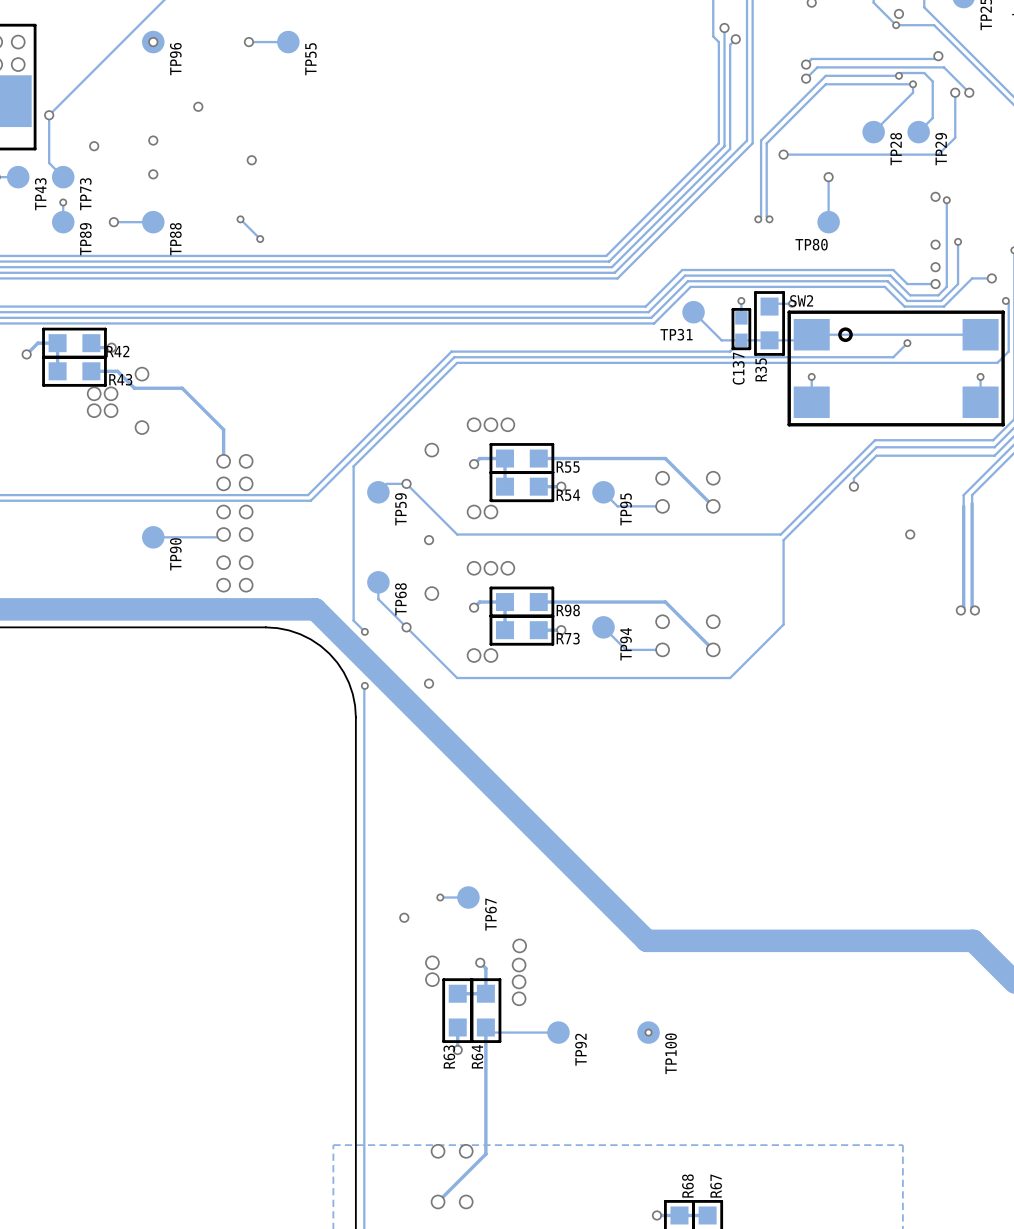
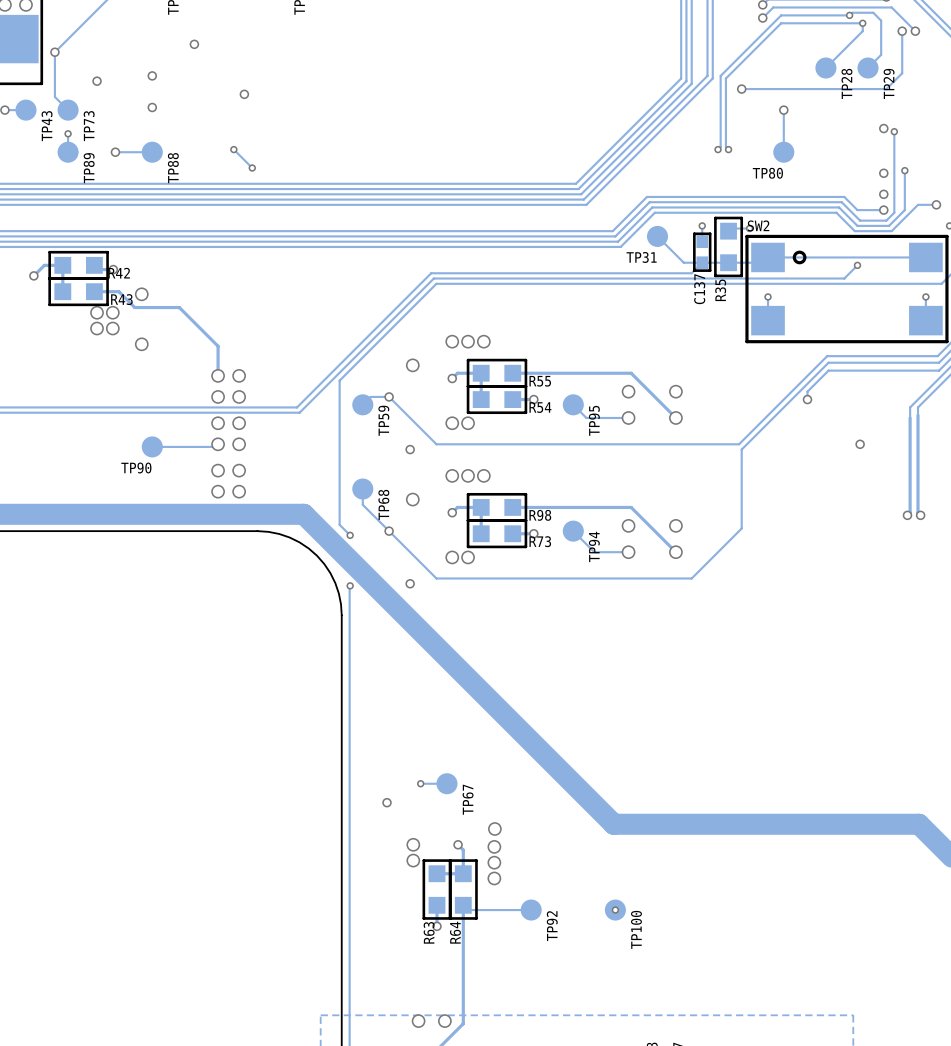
TP90 name rotation: 0° (175, 554) -> 90° clockwise (136, 467)
TP90 name position: TP90 (175, 554) -> TP90 (136, 467)

